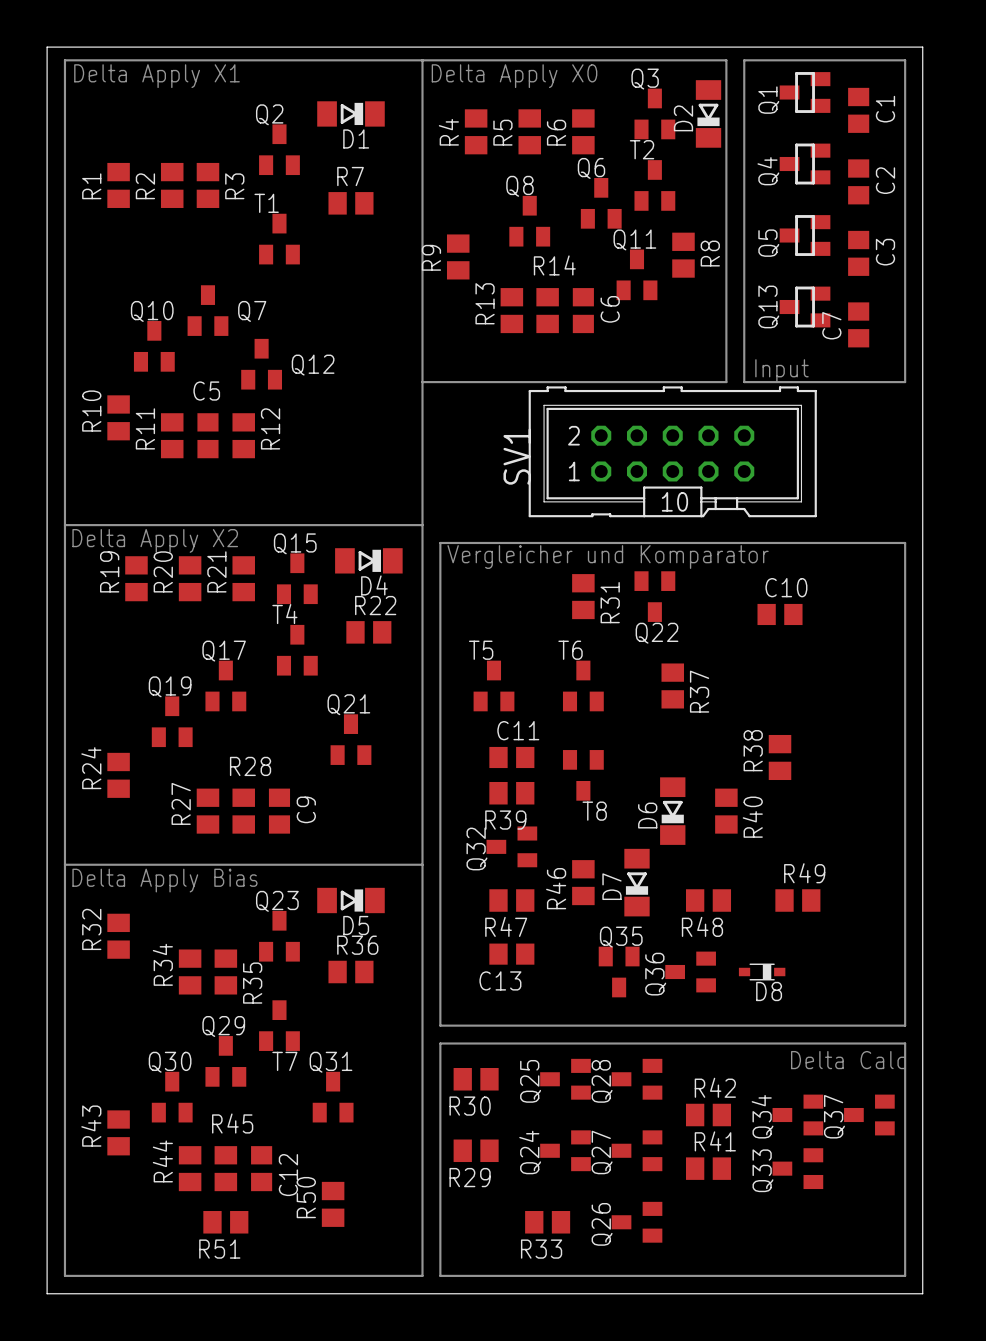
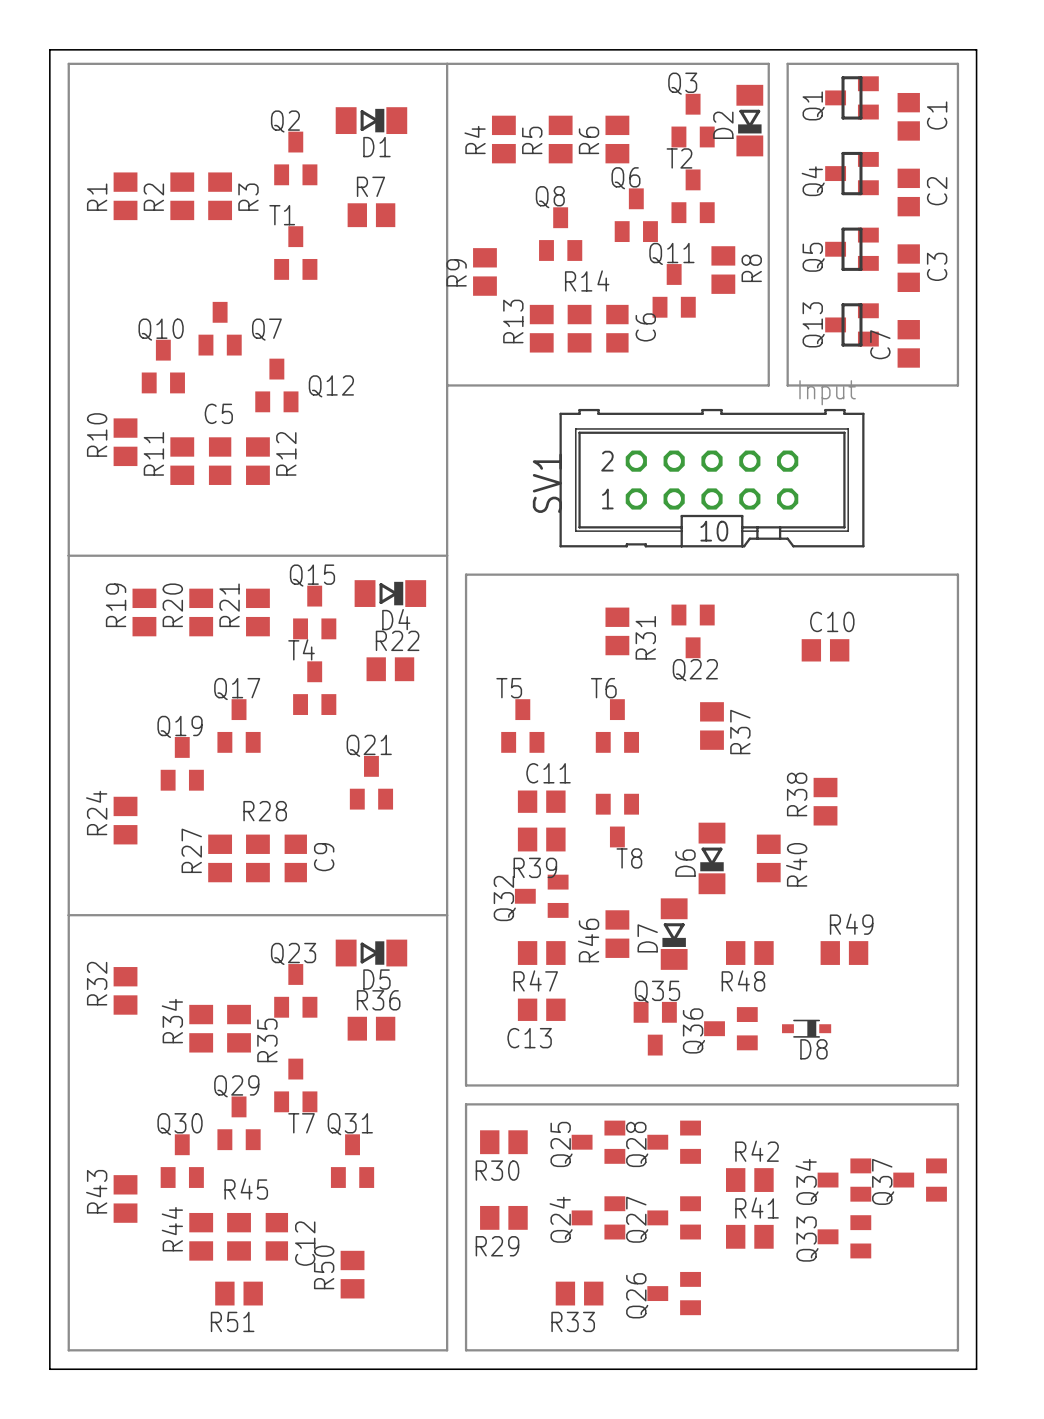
text: Delta Apply X1 (157, 76) -> none
text: Delta Apply X0 (514, 76) -> none
line: (726, 364) (726, 382) (422, 382) -> (768, 385) (447, 385)
line: (744, 364) (744, 382) (905, 382) (905, 364) -> (787, 385) (957, 385)
text: Delta Apply X2 (155, 540) -> none
text: Vergleicher und Komparator (608, 557) -> none
text: Delta Apply Bias (164, 880) -> none
text: Delta Calc (848, 1060) -> none

